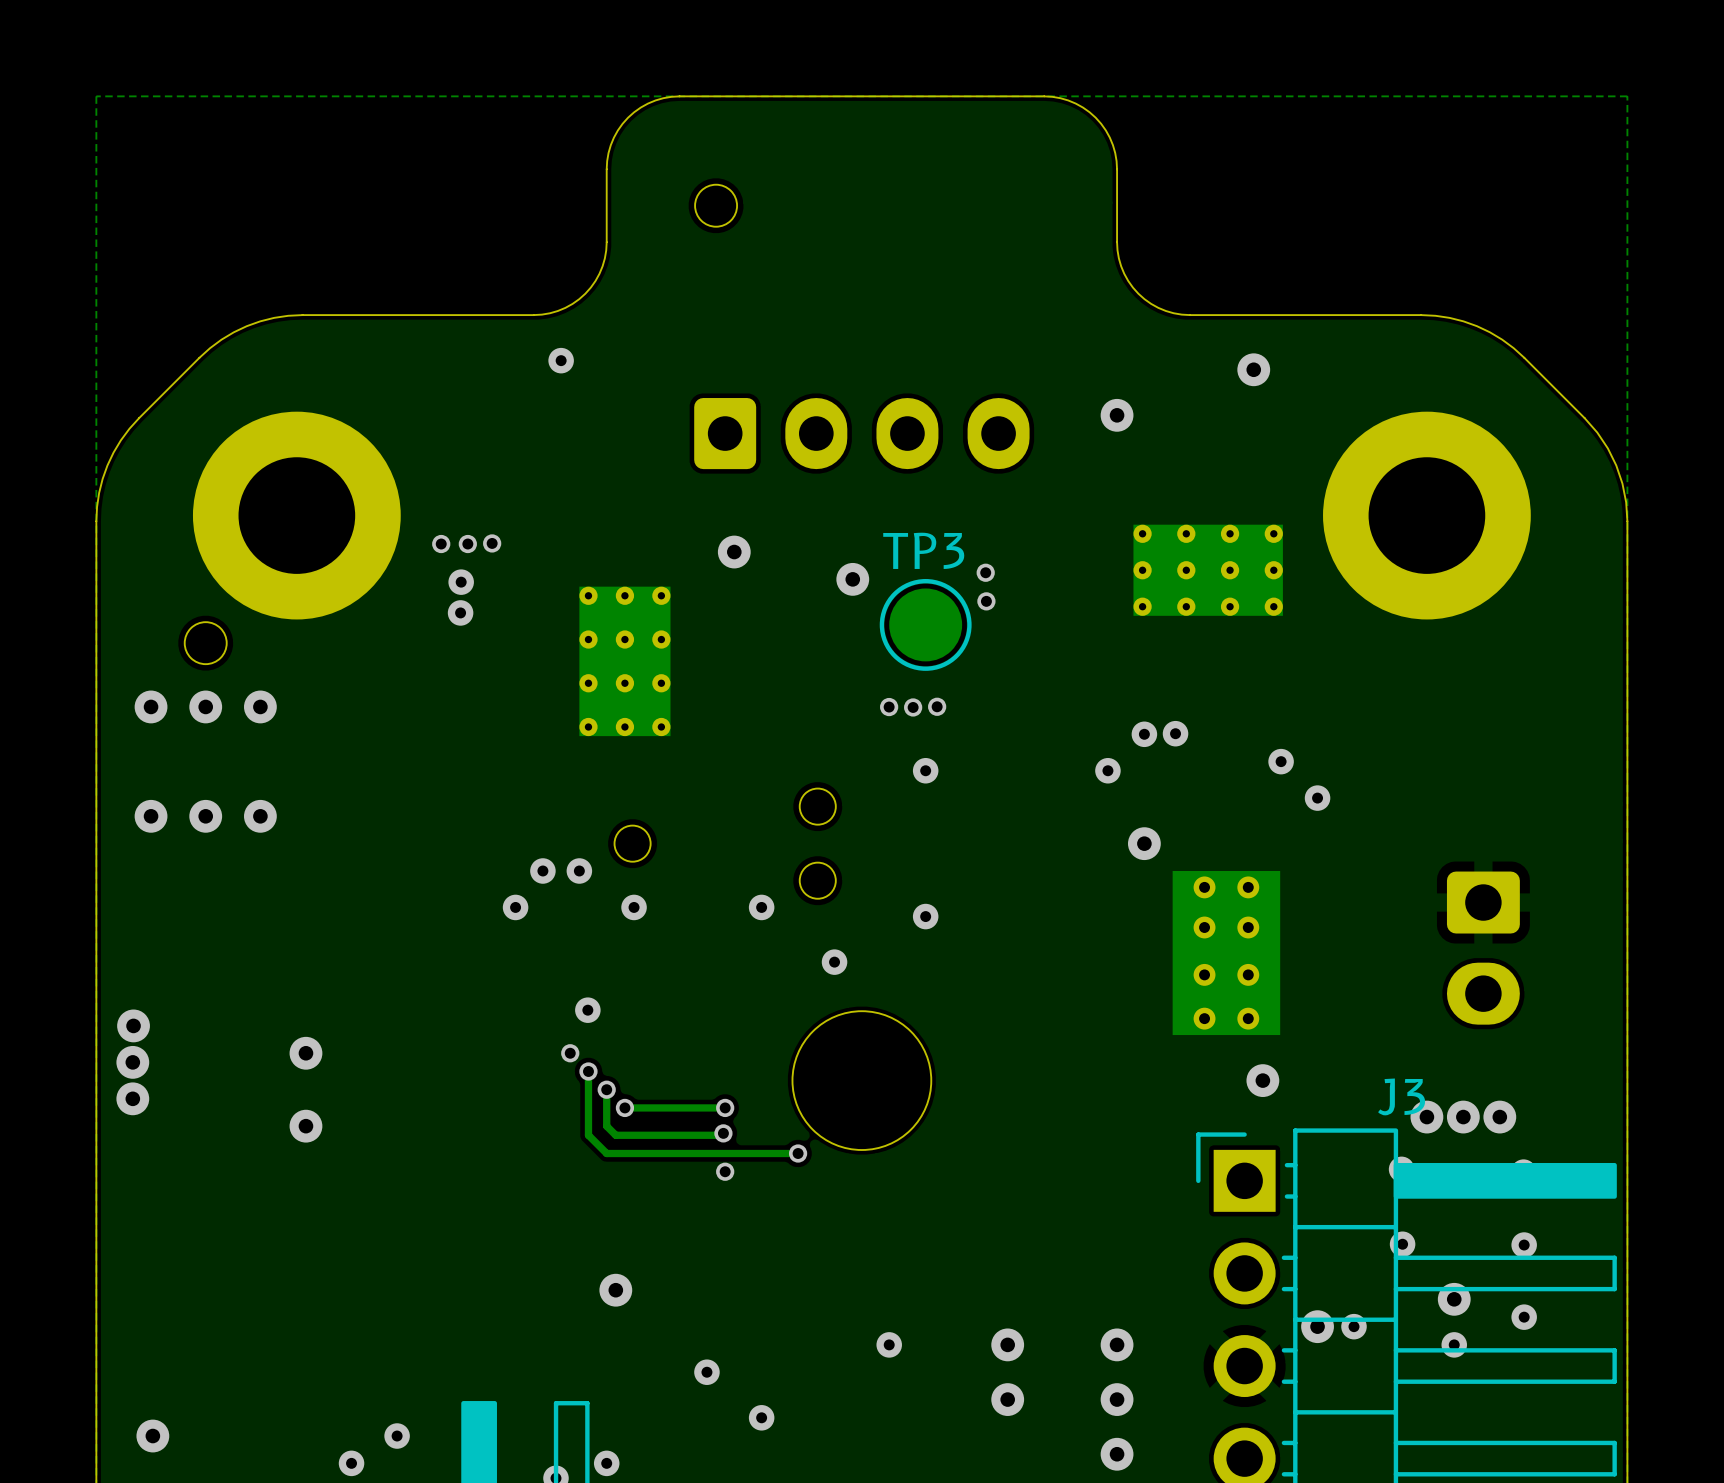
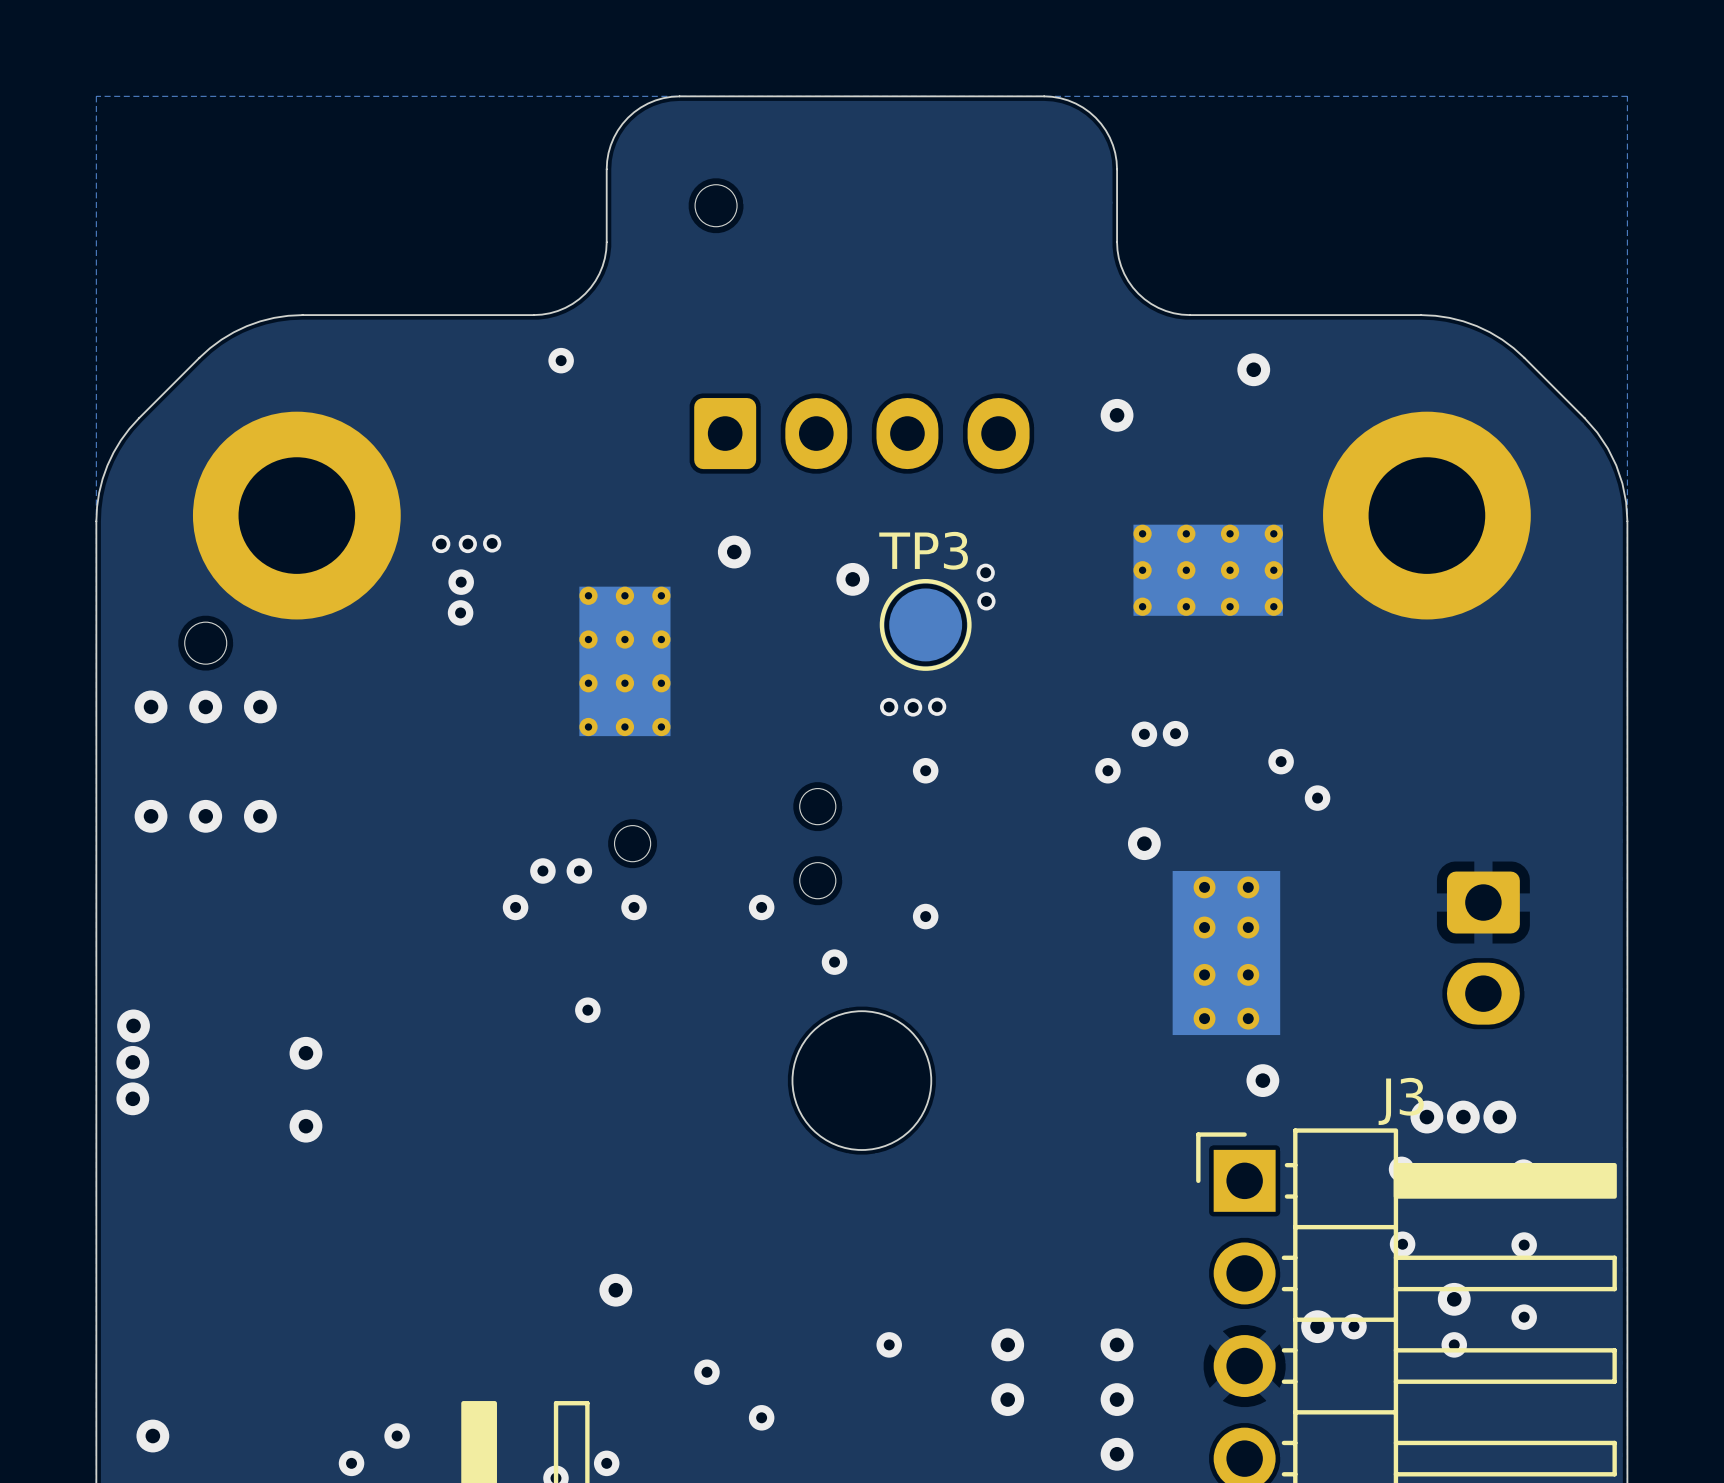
via: (570, 1053) -> none
track: (588, 1071) (588, 1135) (606, 1153) (798, 1153) -> none
via: (588, 1071) -> none
track: (606, 1089) (606, 1126) (615, 1135) (721, 1135) (723, 1133) -> none
via: (606, 1089) -> none
via: (624, 1107) -> none
track: (725, 1107) (624, 1107) -> none
via: (725, 1107) -> none
via: (723, 1133) -> none
via: (798, 1153) -> none
via: (725, 1171) -> none

